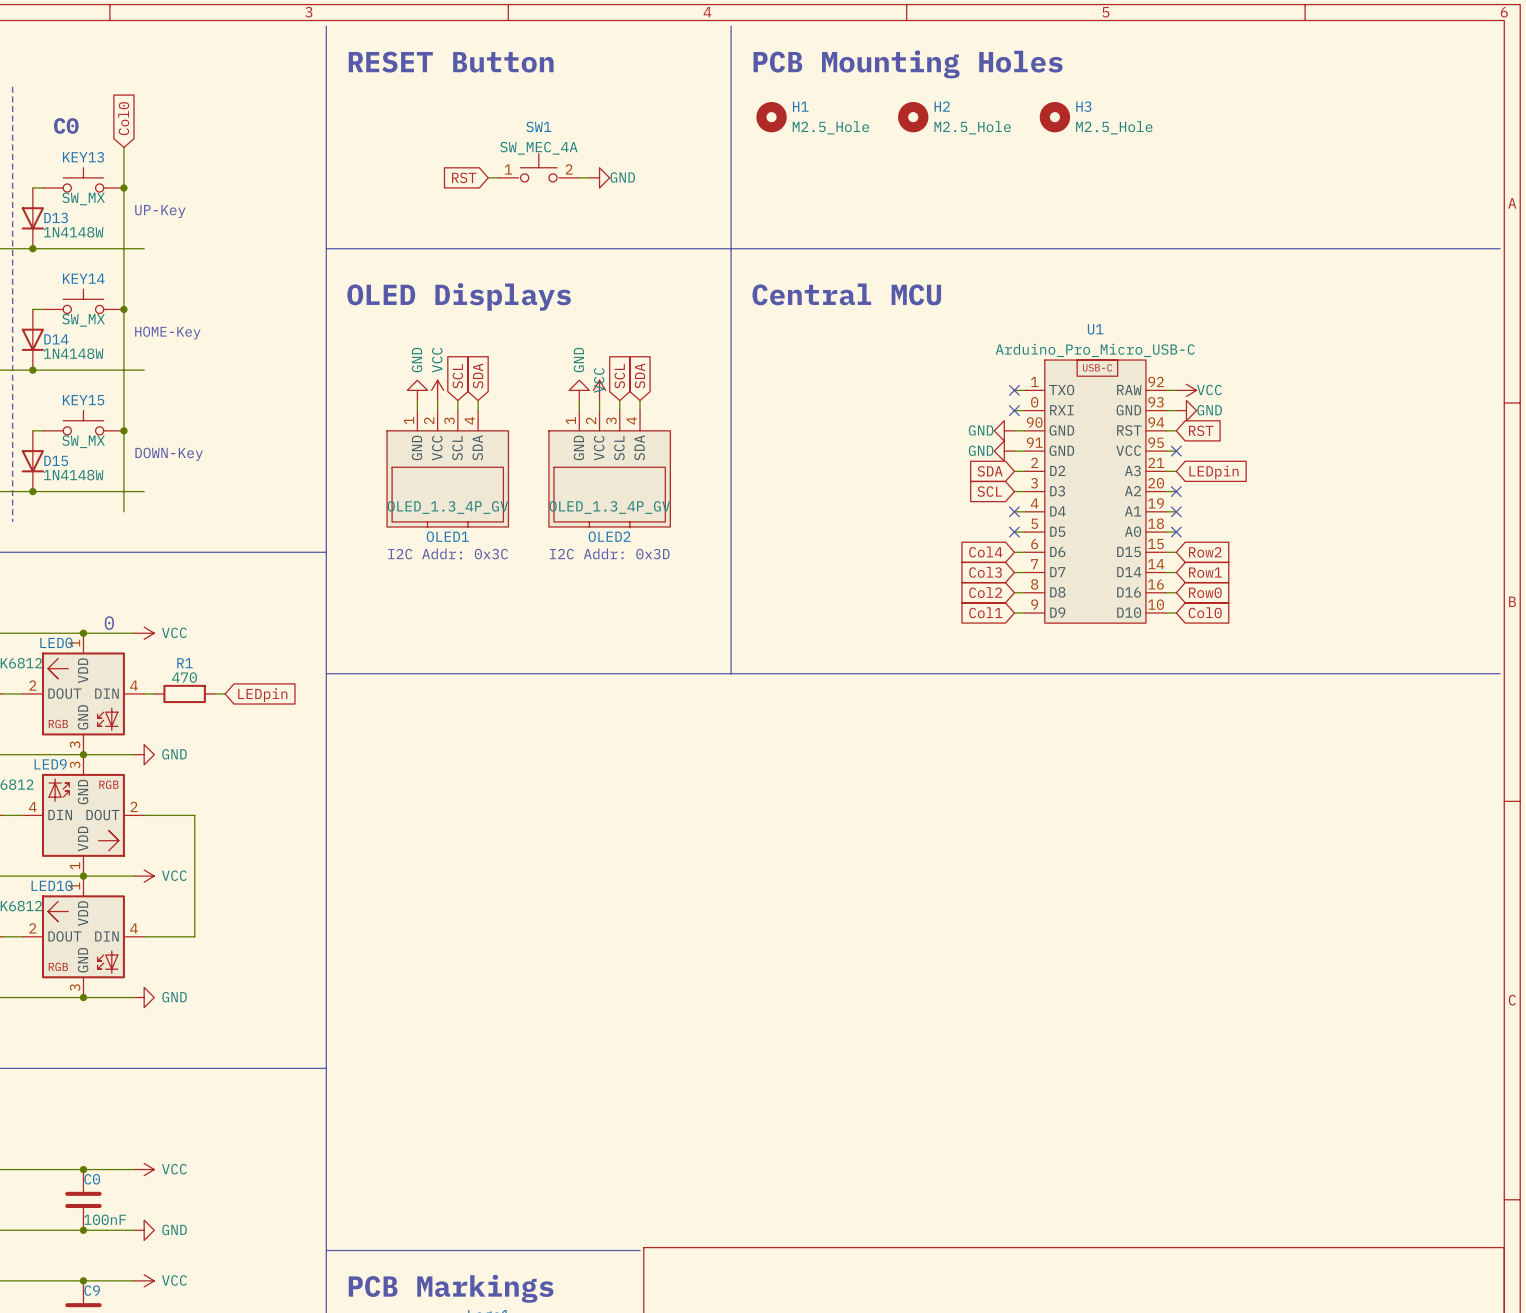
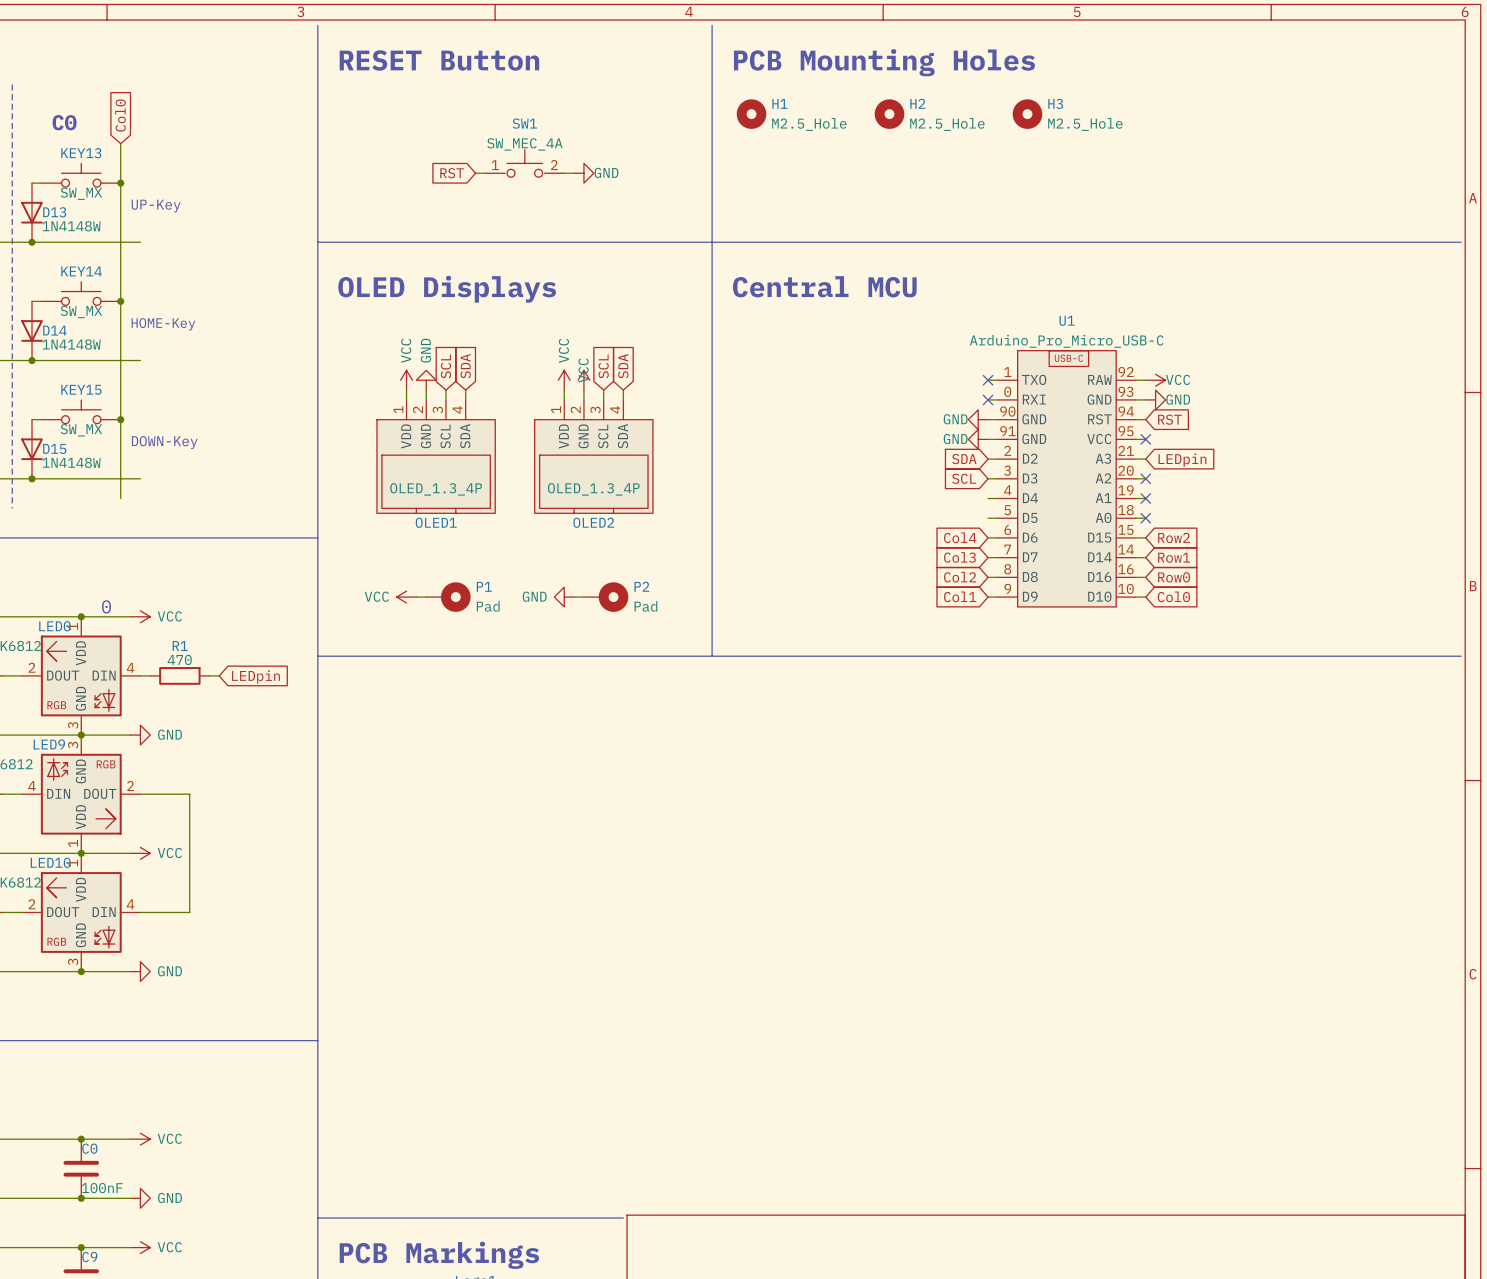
power symbol: GND (417, 390) -> VCC (406, 380)
power symbol: VCC (437, 390) -> GND (426, 380)
power symbol: GND (579, 390) -> VCC (564, 380)
OLED1 pin name: GND (417, 447) -> VDD (406, 436)
OLED2 pin name: GND (578, 447) -> VDD (563, 436)
OLED1 pin name: VCC (437, 448) -> GND (425, 436)
OLED2 pin name: VCC (599, 448) -> GND (583, 436)
OLED1 value: OLED_1.3_4P_GV (447, 507) -> OLED_1.3_4P (436, 489)
OLED2 value: OLED_1.3_4P_GV (609, 507) -> OLED_1.3_4P (593, 489)
no-connect mark: (1014, 511) -> none
no-connect mark: (1014, 532) -> none
text: I2C Addr: 0x3C (448, 553) -> none
text: I2C Addr: 0x3D (609, 553) -> none
power symbol: none -> VCC (406, 597)
wire: none -> (416, 597) (426, 597)
P1: none -> Pad (448, 597)
power symbol: none -> GND (564, 597)
wire: none -> (574, 597) (583, 597)
P2: none -> Pad (606, 597)

